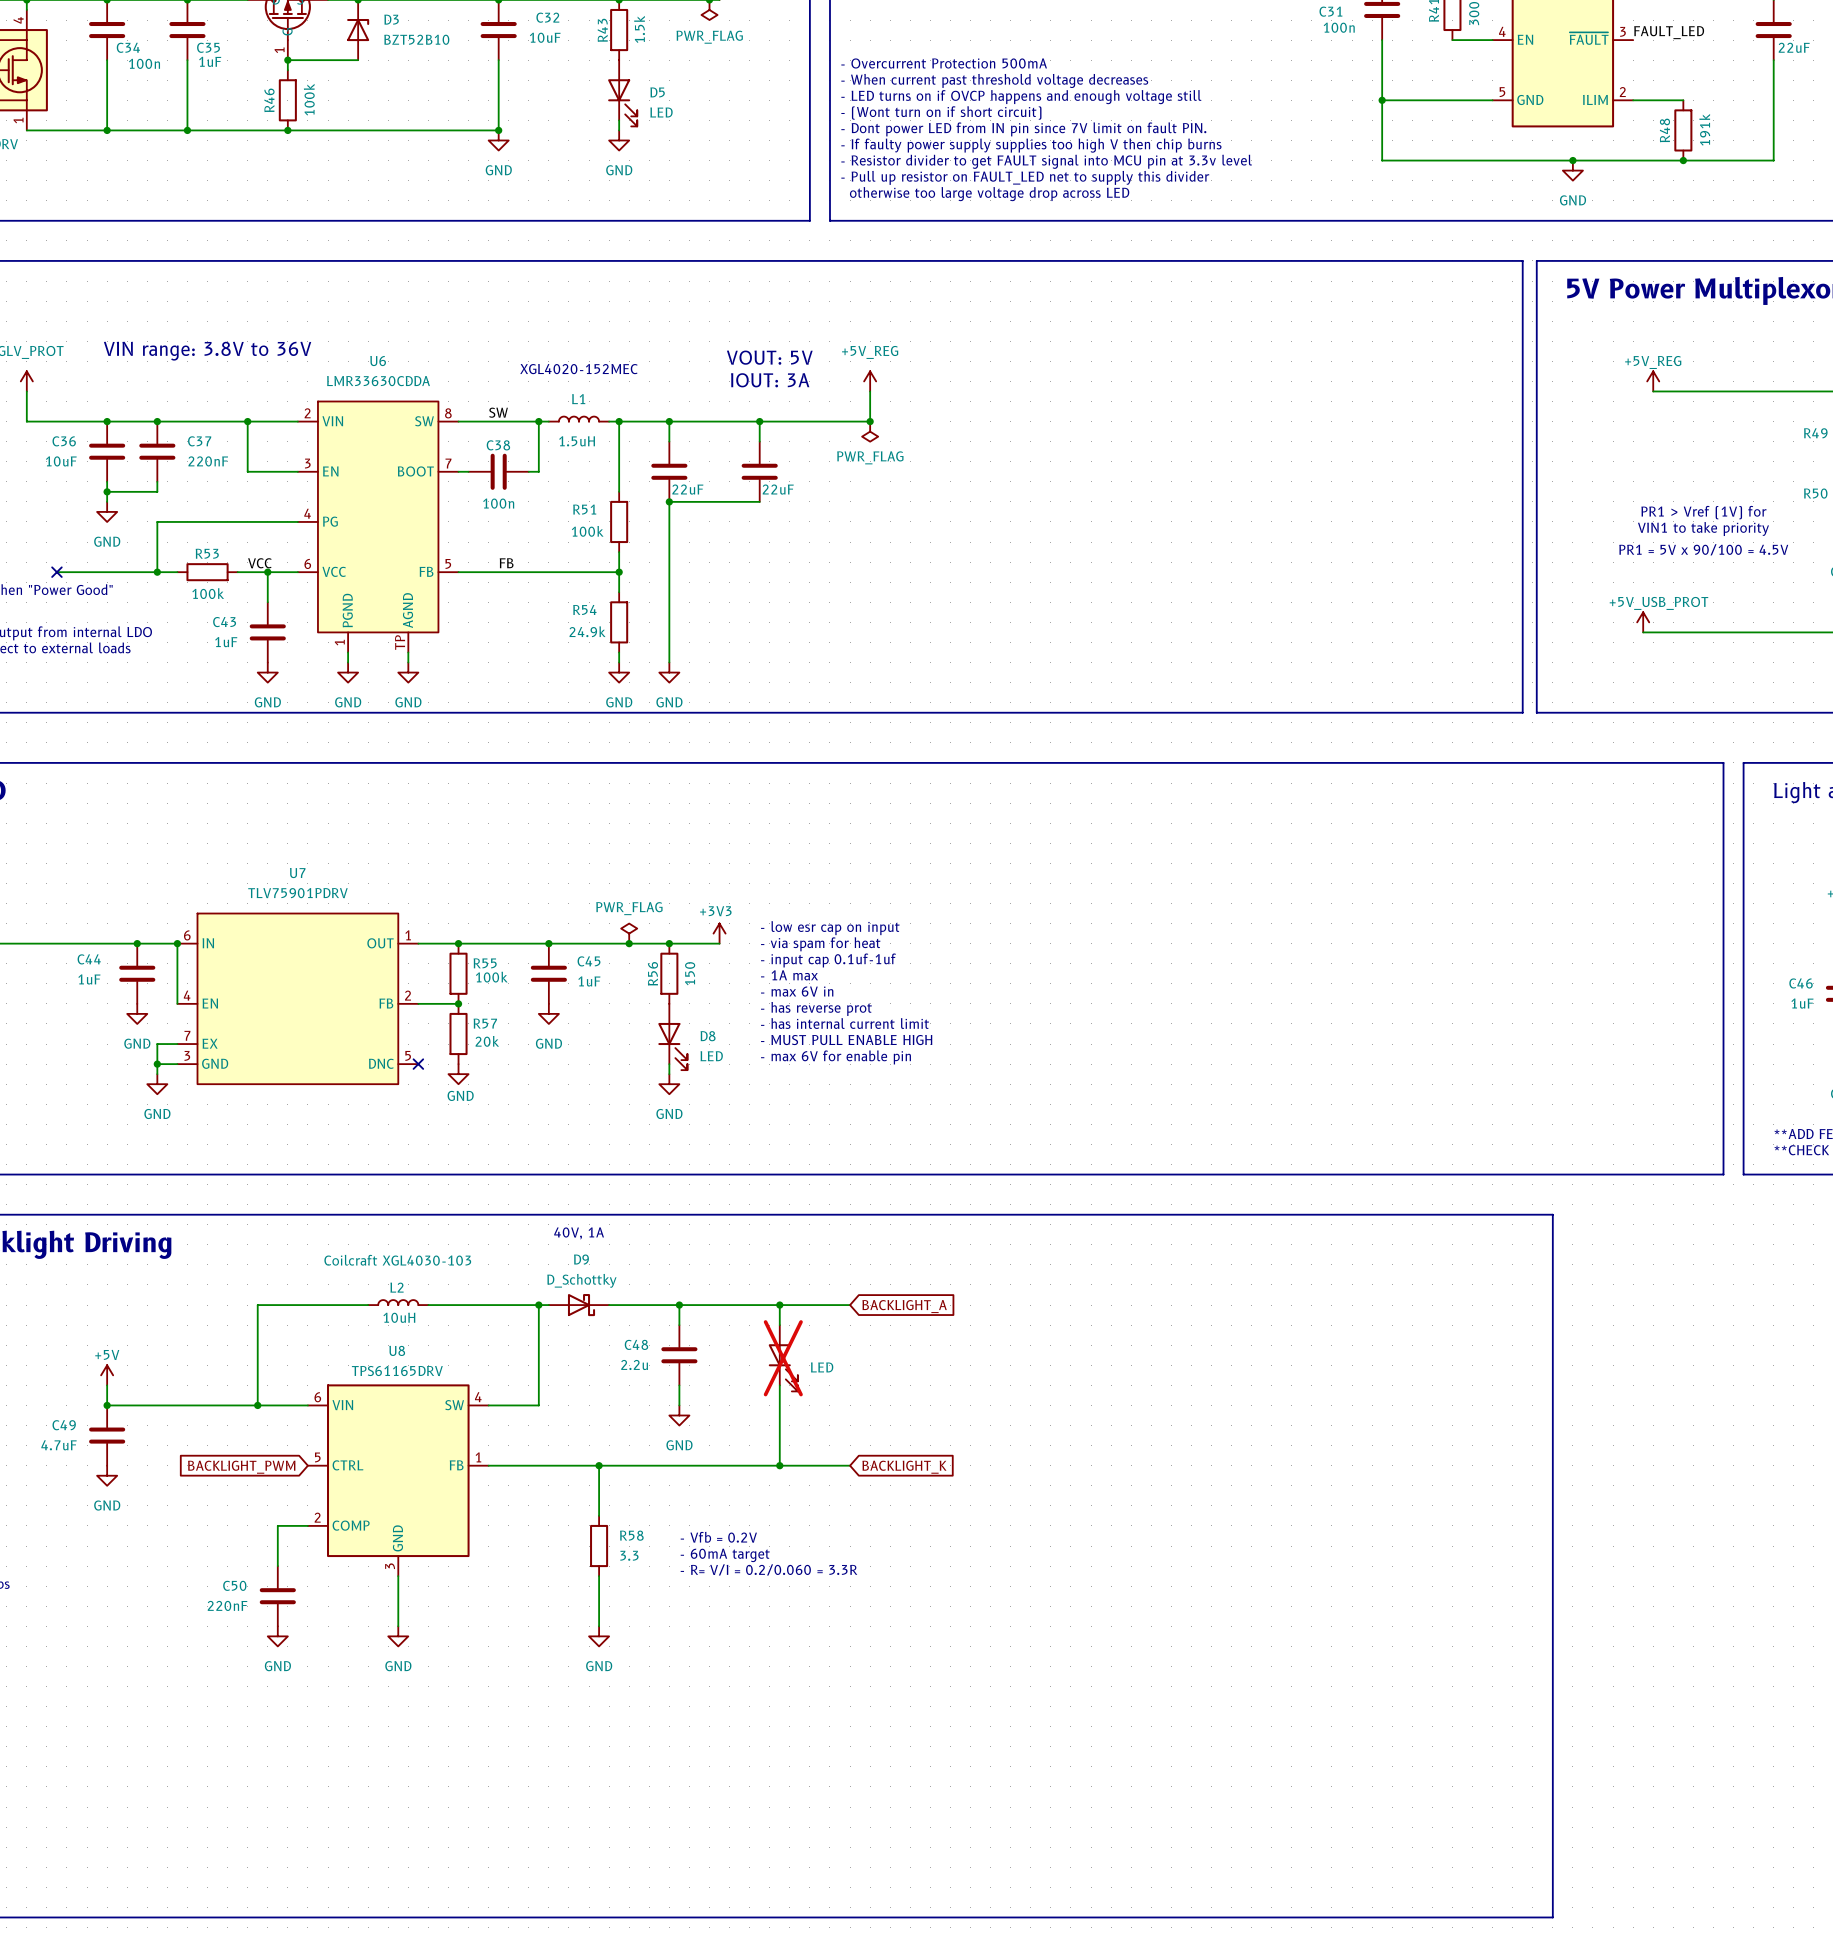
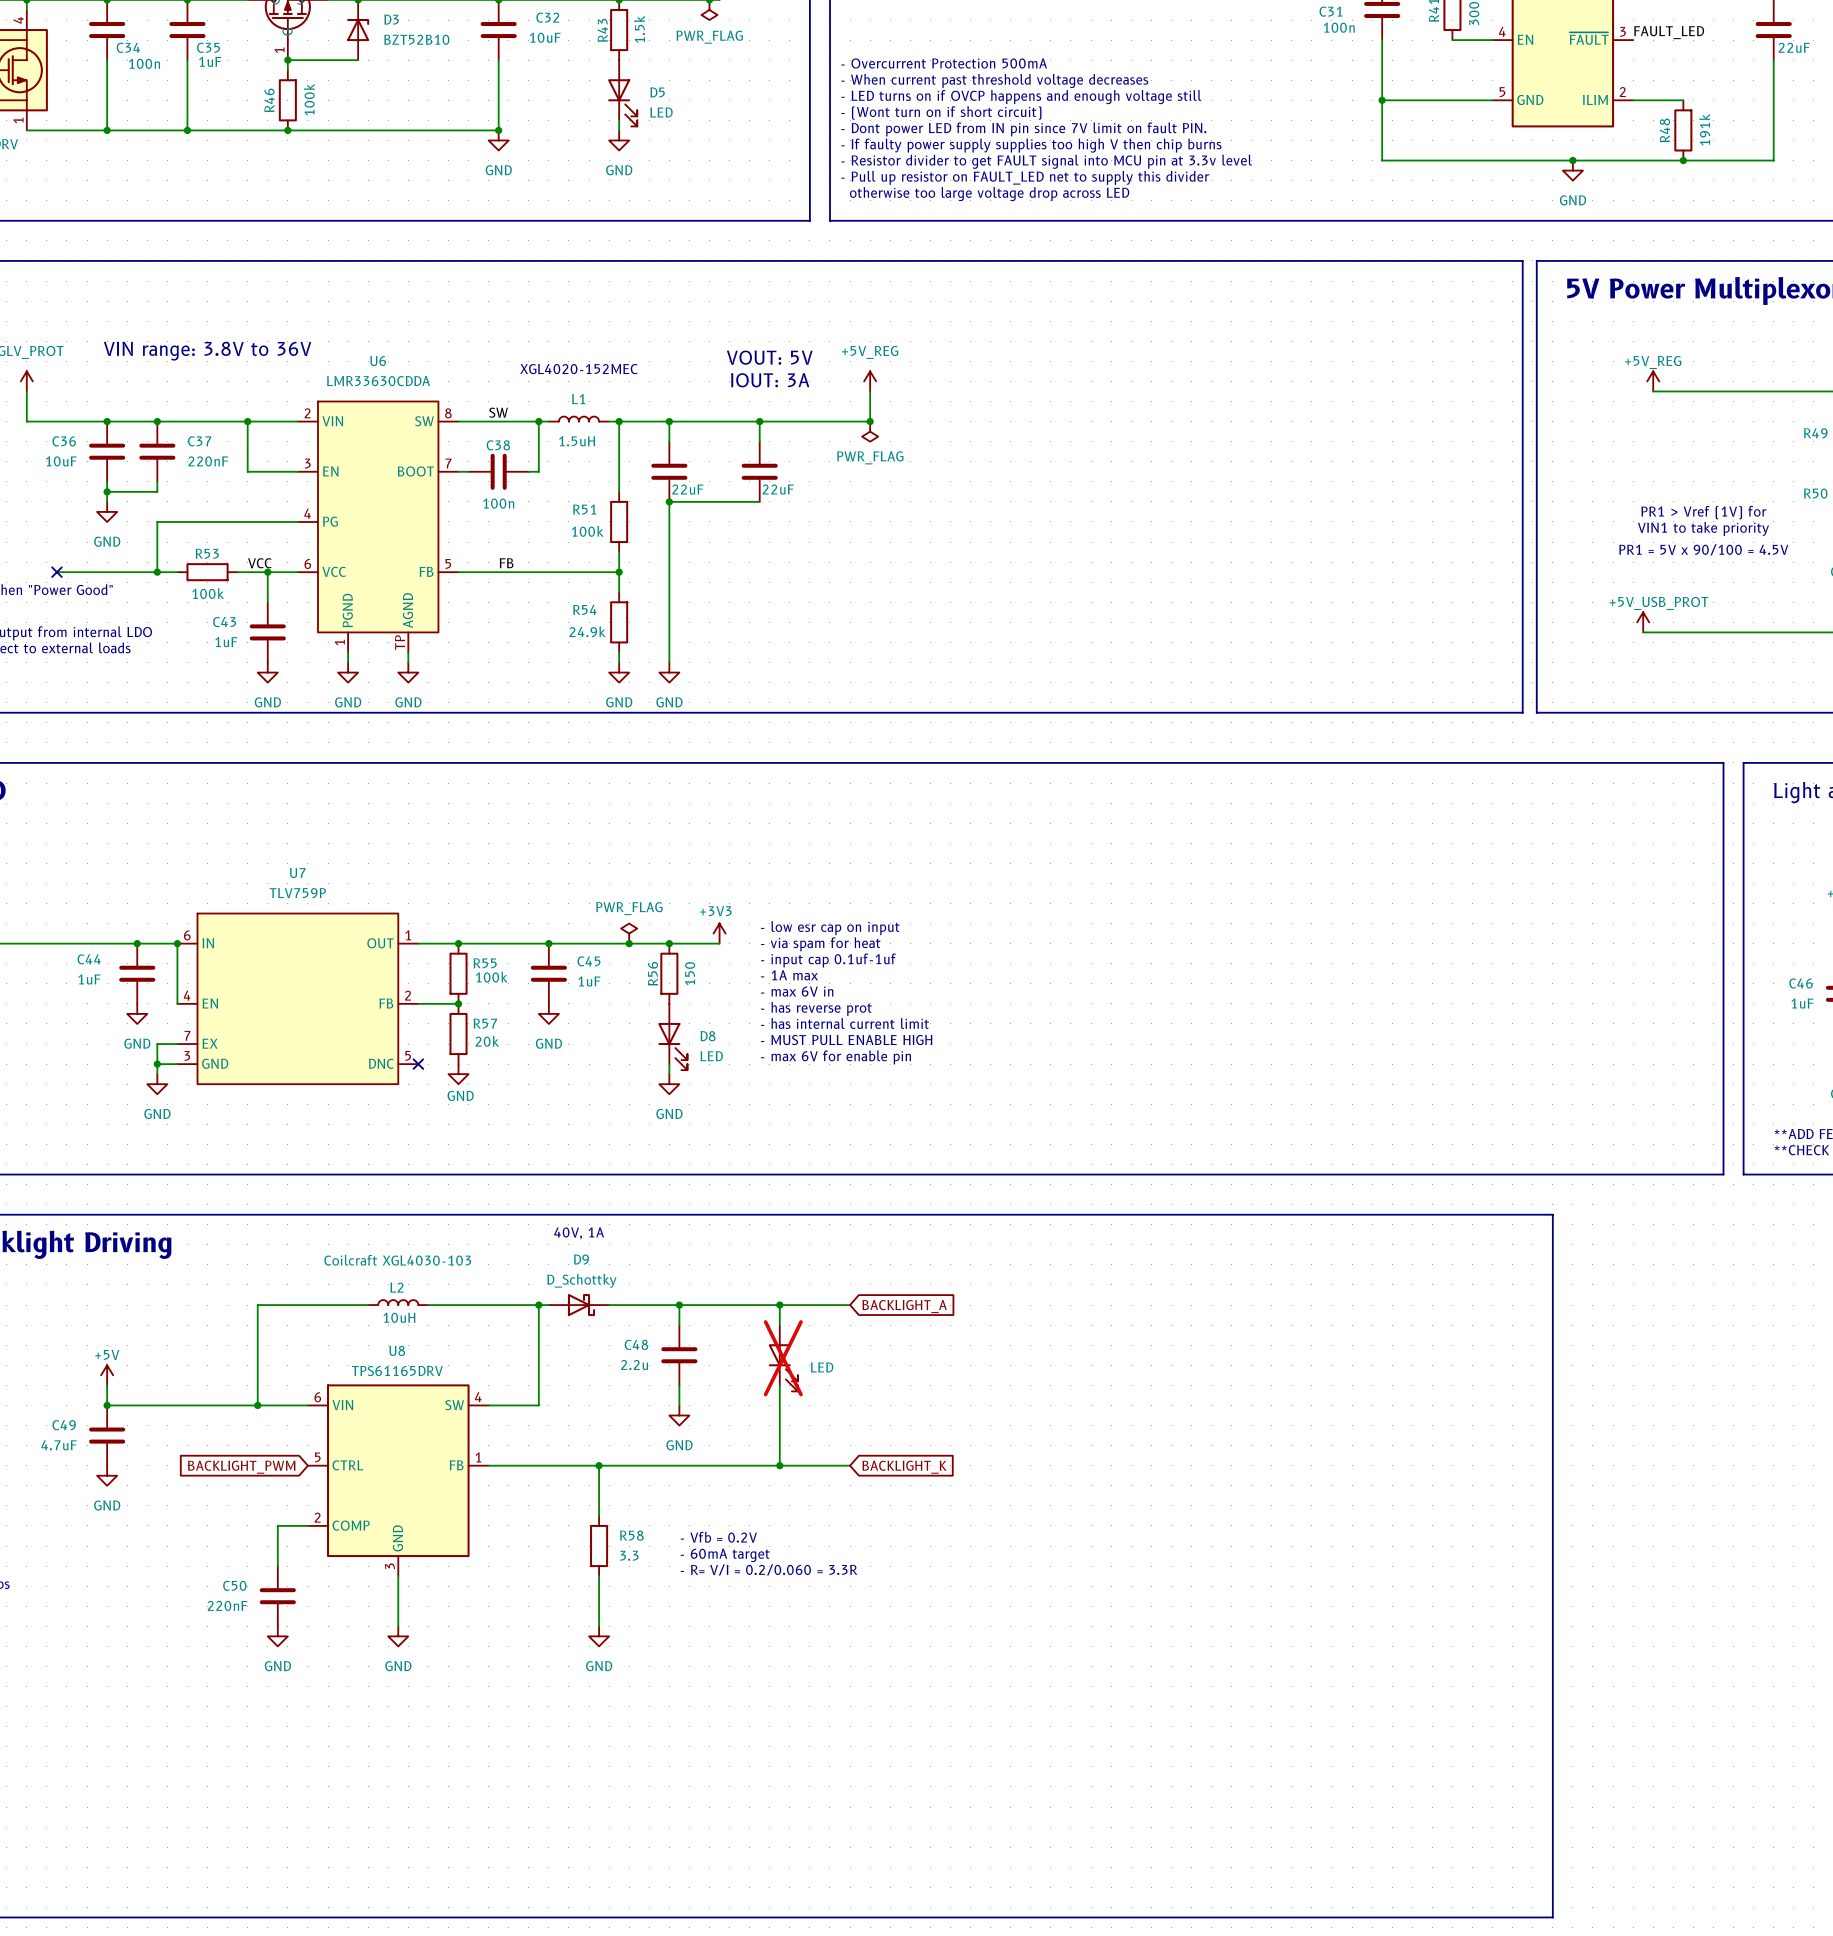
U7 value: TLV75901PDRV (297, 893) -> TLV759P (297, 893)

